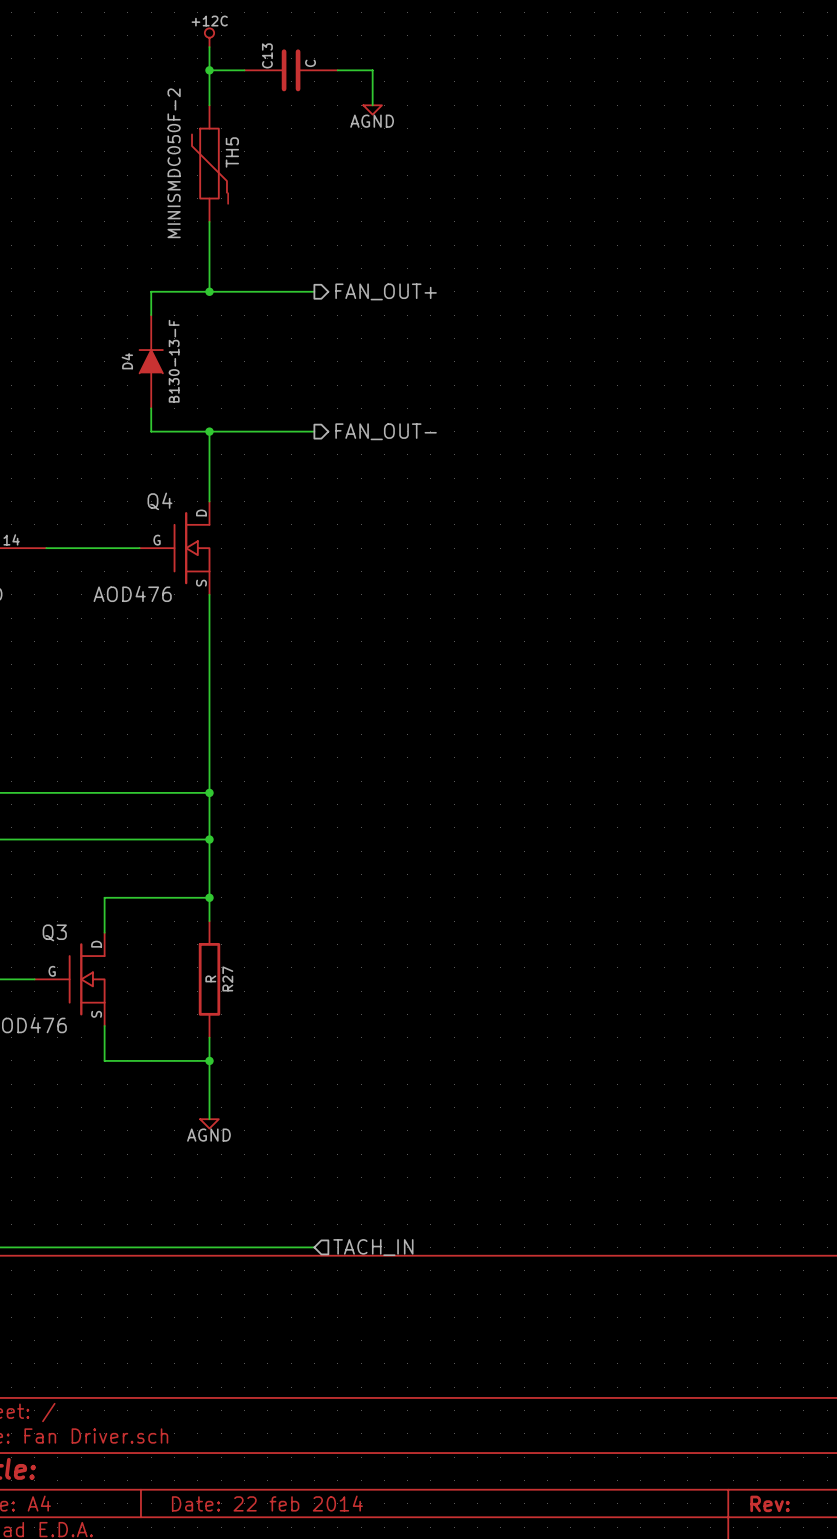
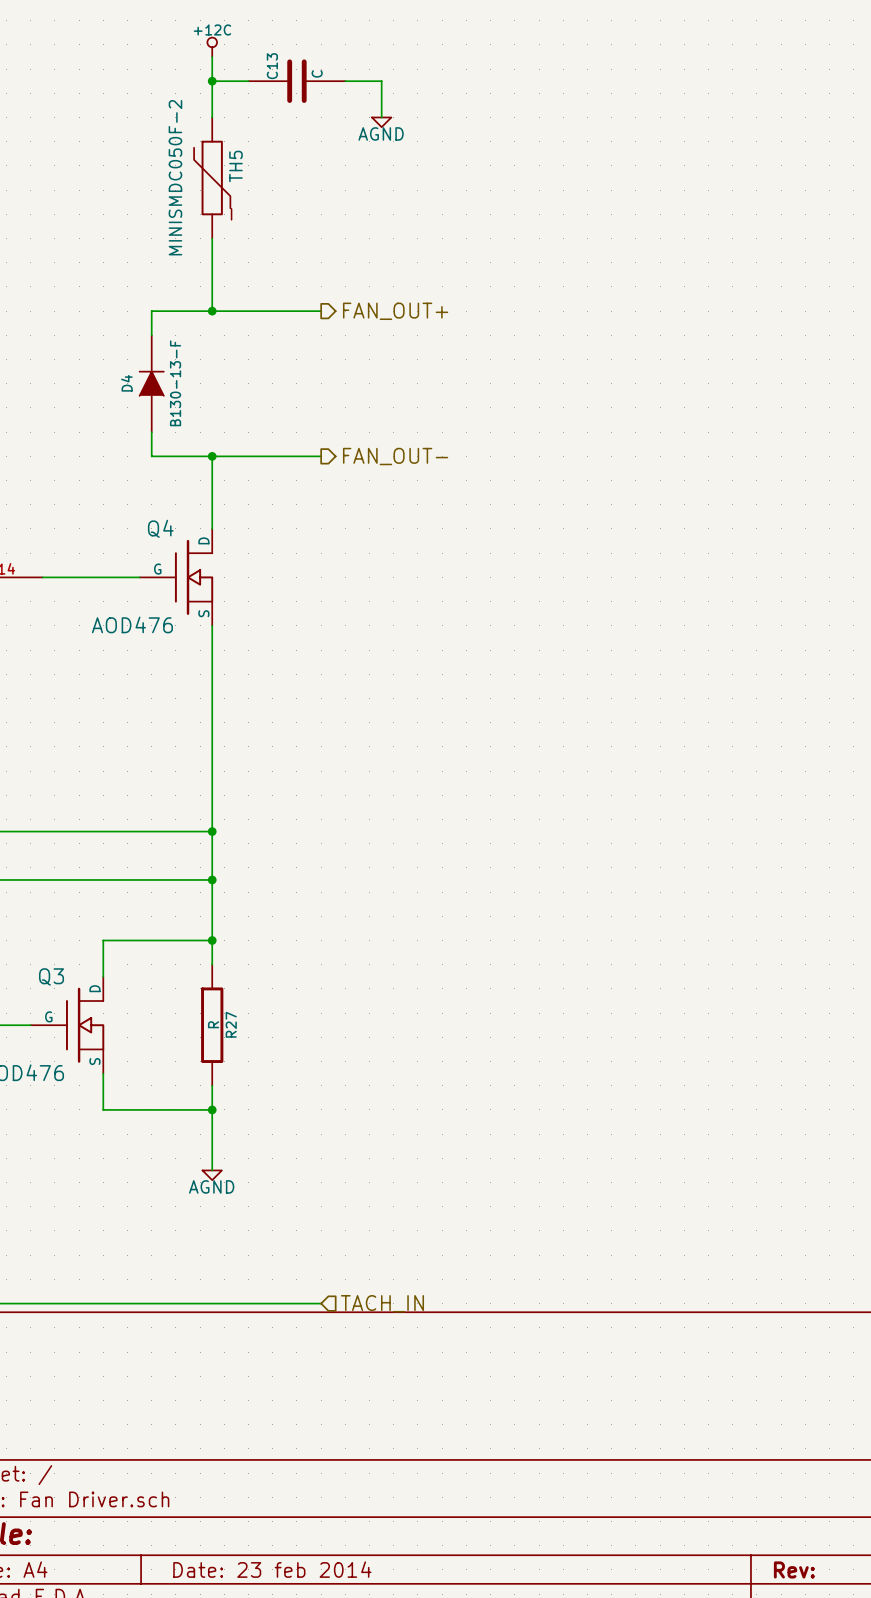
title block: Date: 22 feb 2014 (267, 1503) -> Date: 23 feb 2014 (272, 1569)

